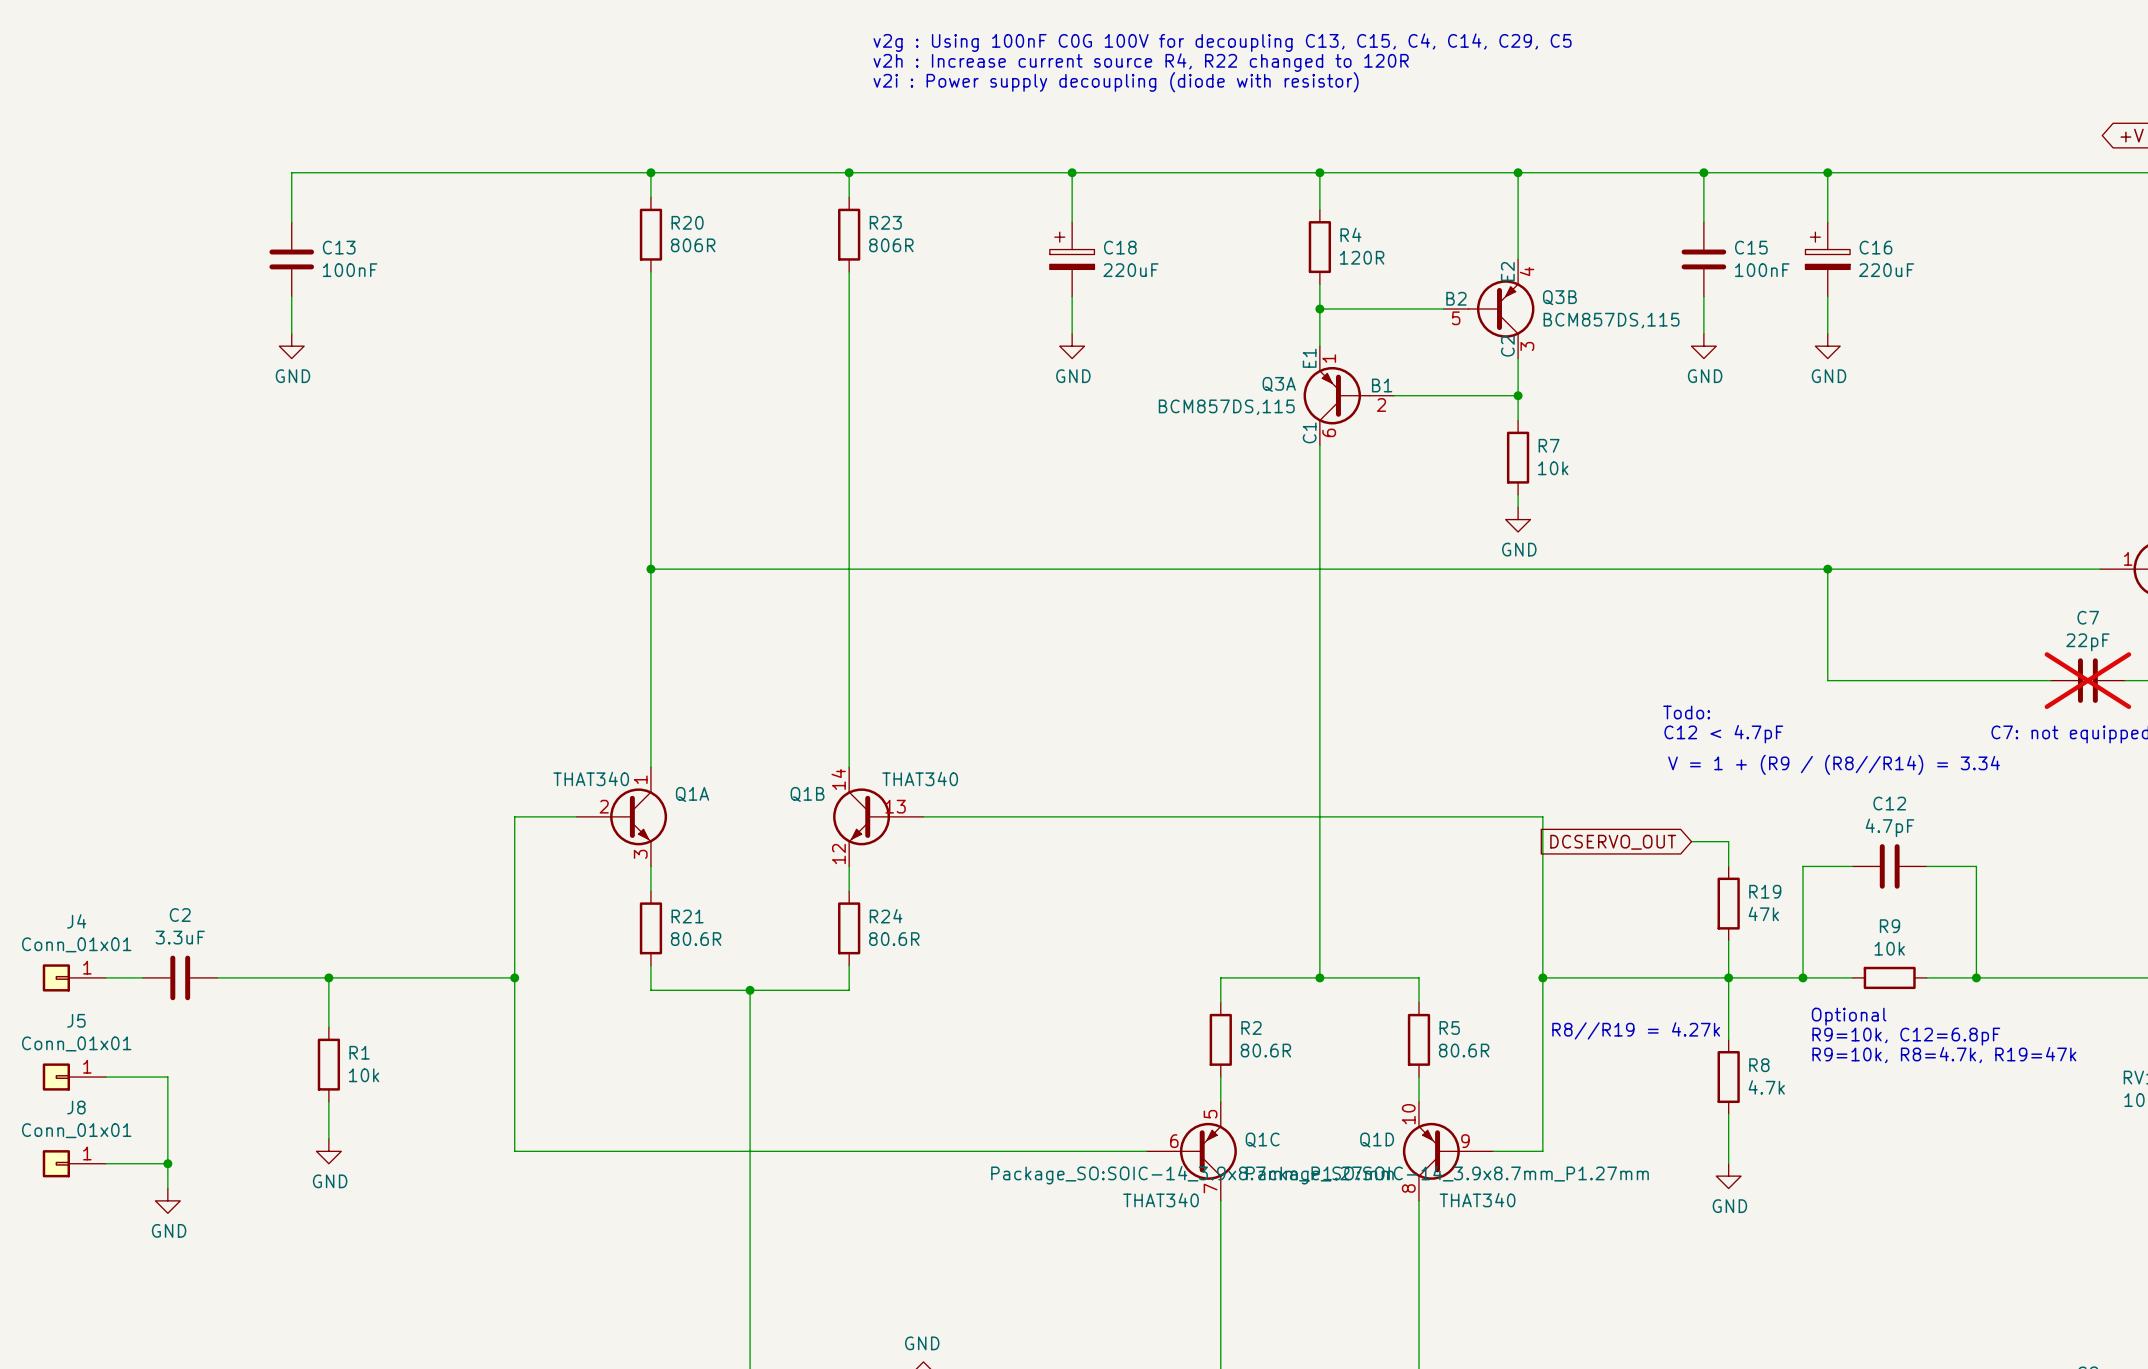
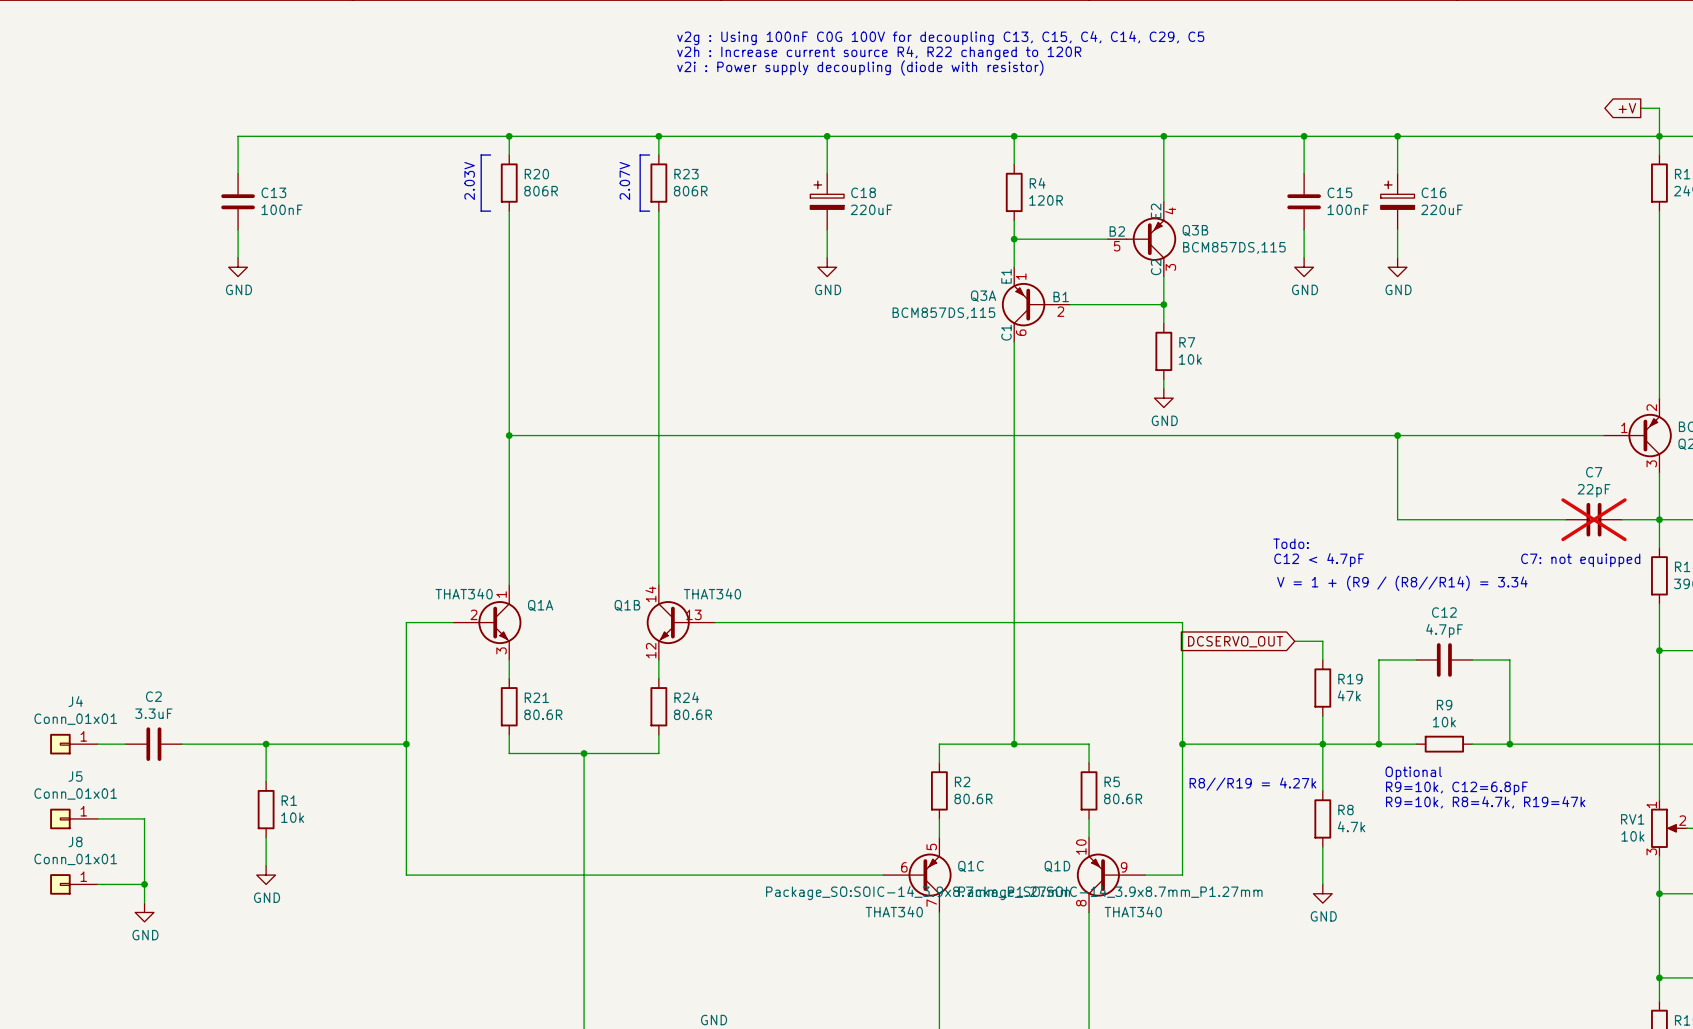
line: none -> (490, 155) (481, 155) (481, 211) (490, 211)
line: none -> (649, 155) (640, 155) (640, 211) (649, 211)
text: none -> 2.03V (469, 181)
text: none -> 2.07V (624, 181)

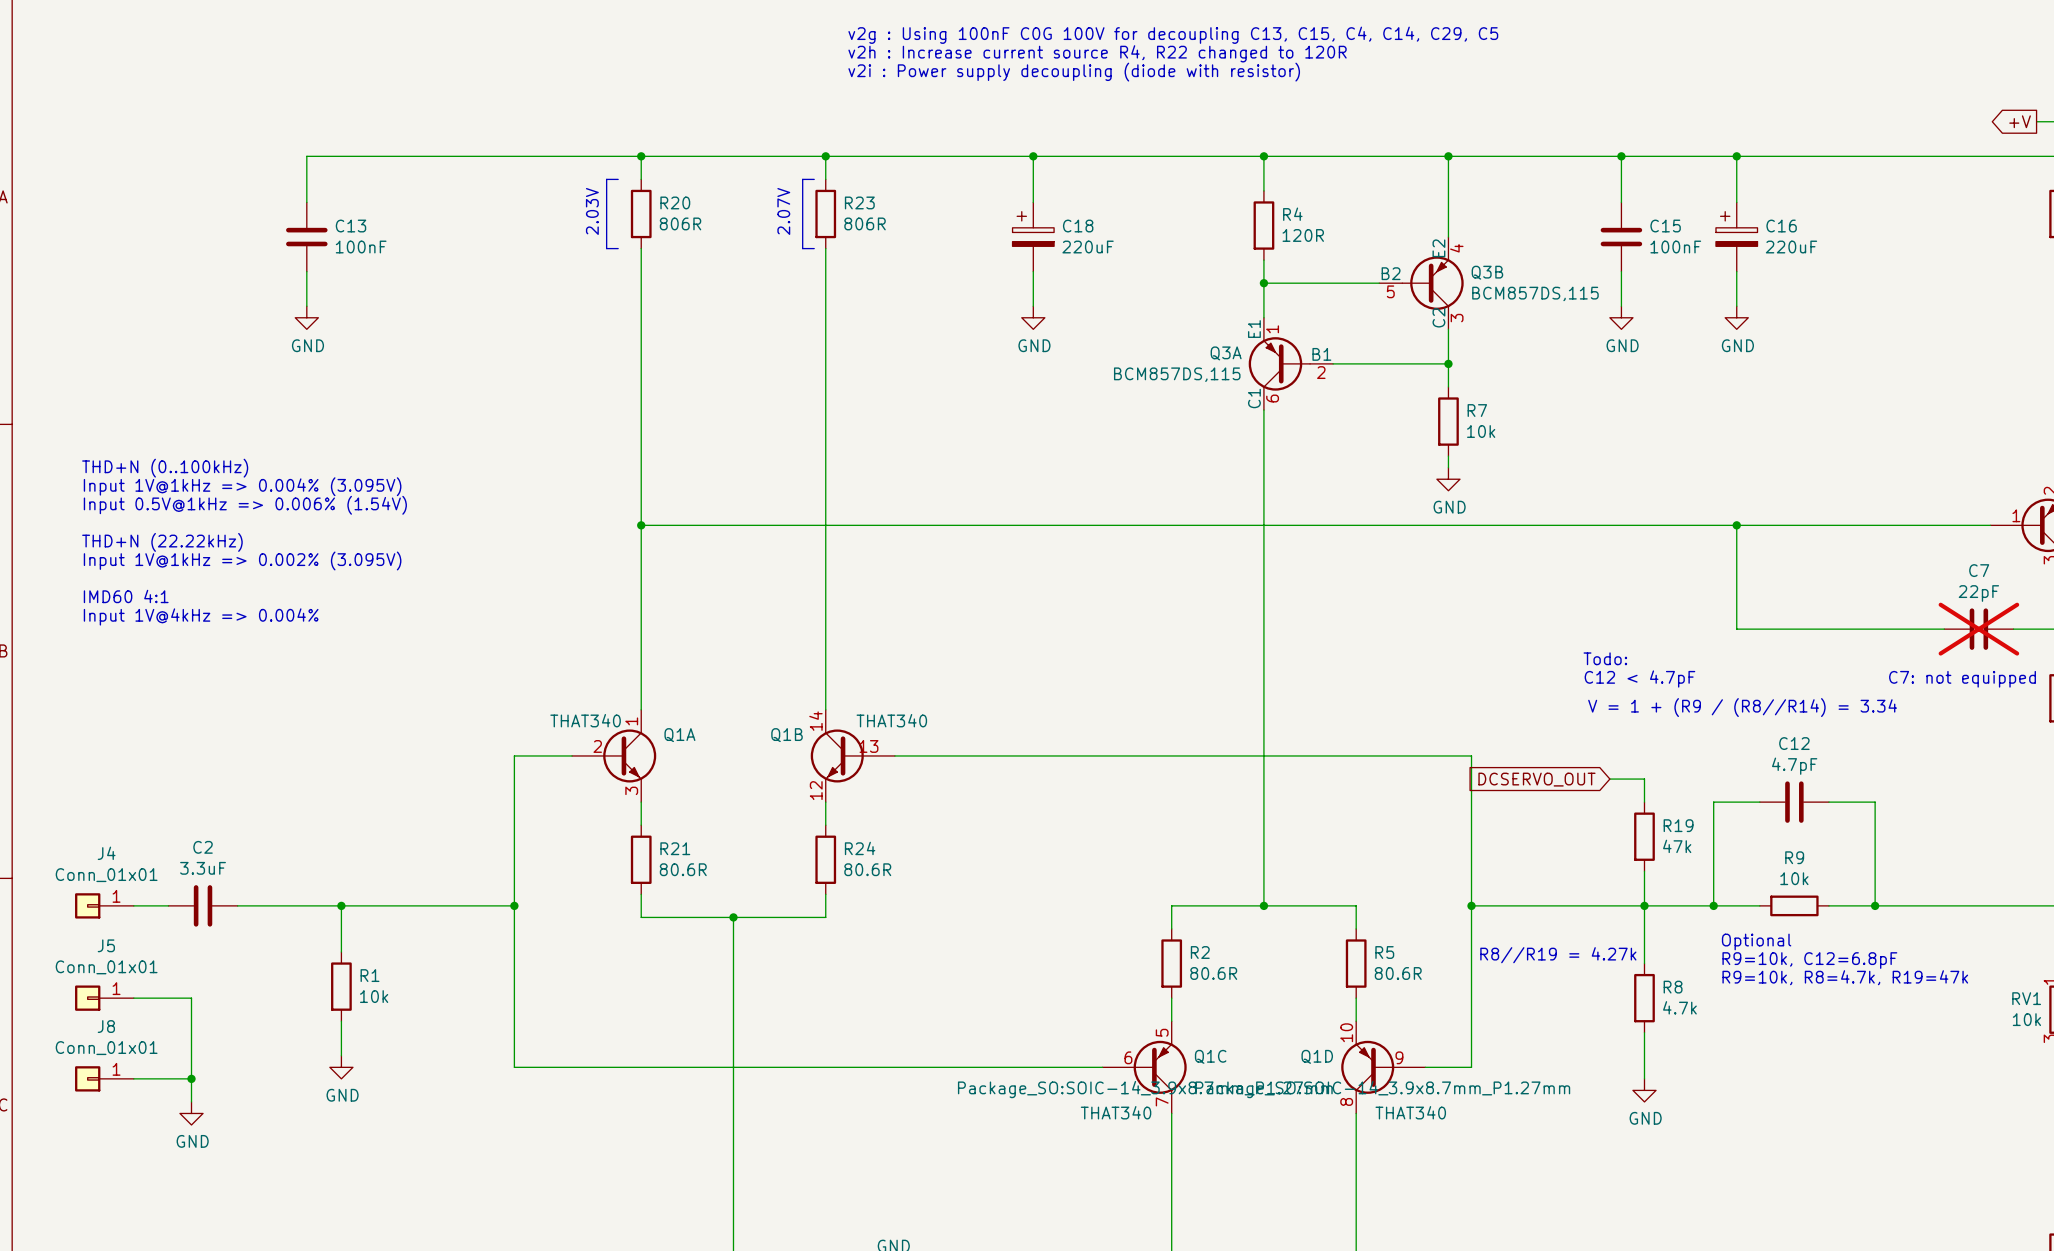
text: none -> THD+N (0..100kHz) (165, 468)
text: none -> Input 1V@1kHz => 0.004% (3.095V) (242, 486)
text: none -> Input 0.5V@1kHz => 0.006% (1.54V) (245, 505)
text: none -> THD+N (22.22kHz) (162, 542)
text: none -> Input 1V@1kHz => 0.002% (3.095V) (242, 560)
text: none -> IMD60 4:1 (126, 596)
text: none -> Input 1V@4kHz => 0.004% (201, 616)

